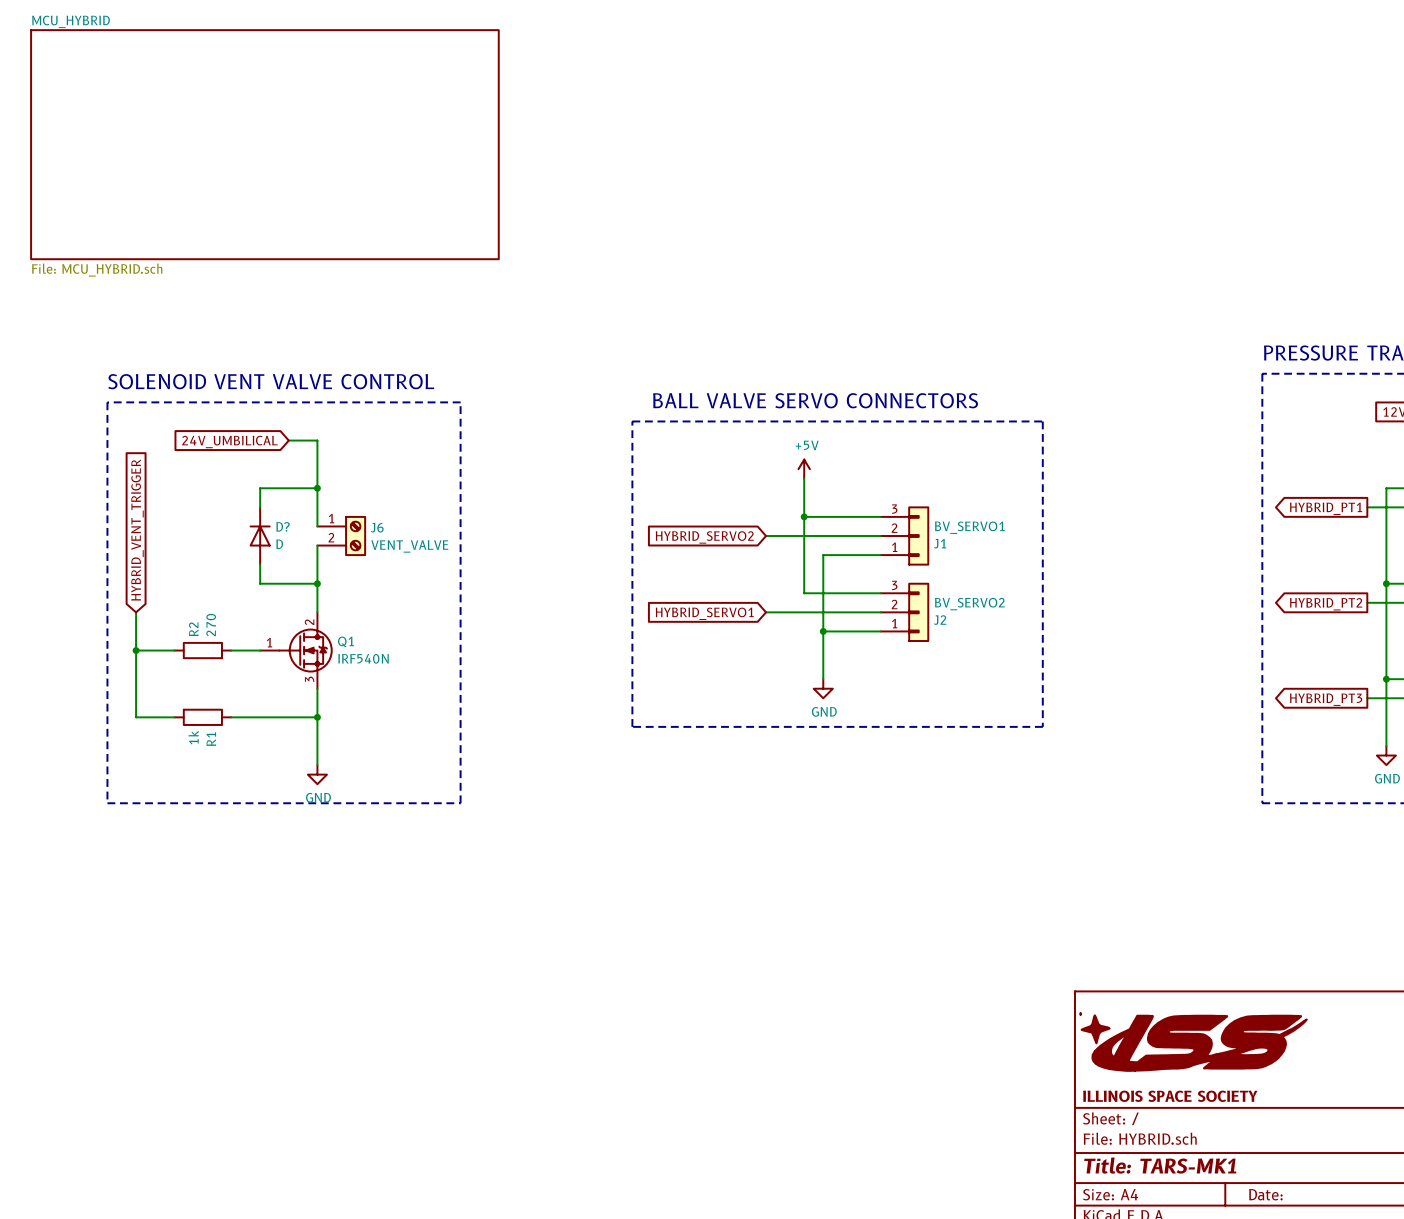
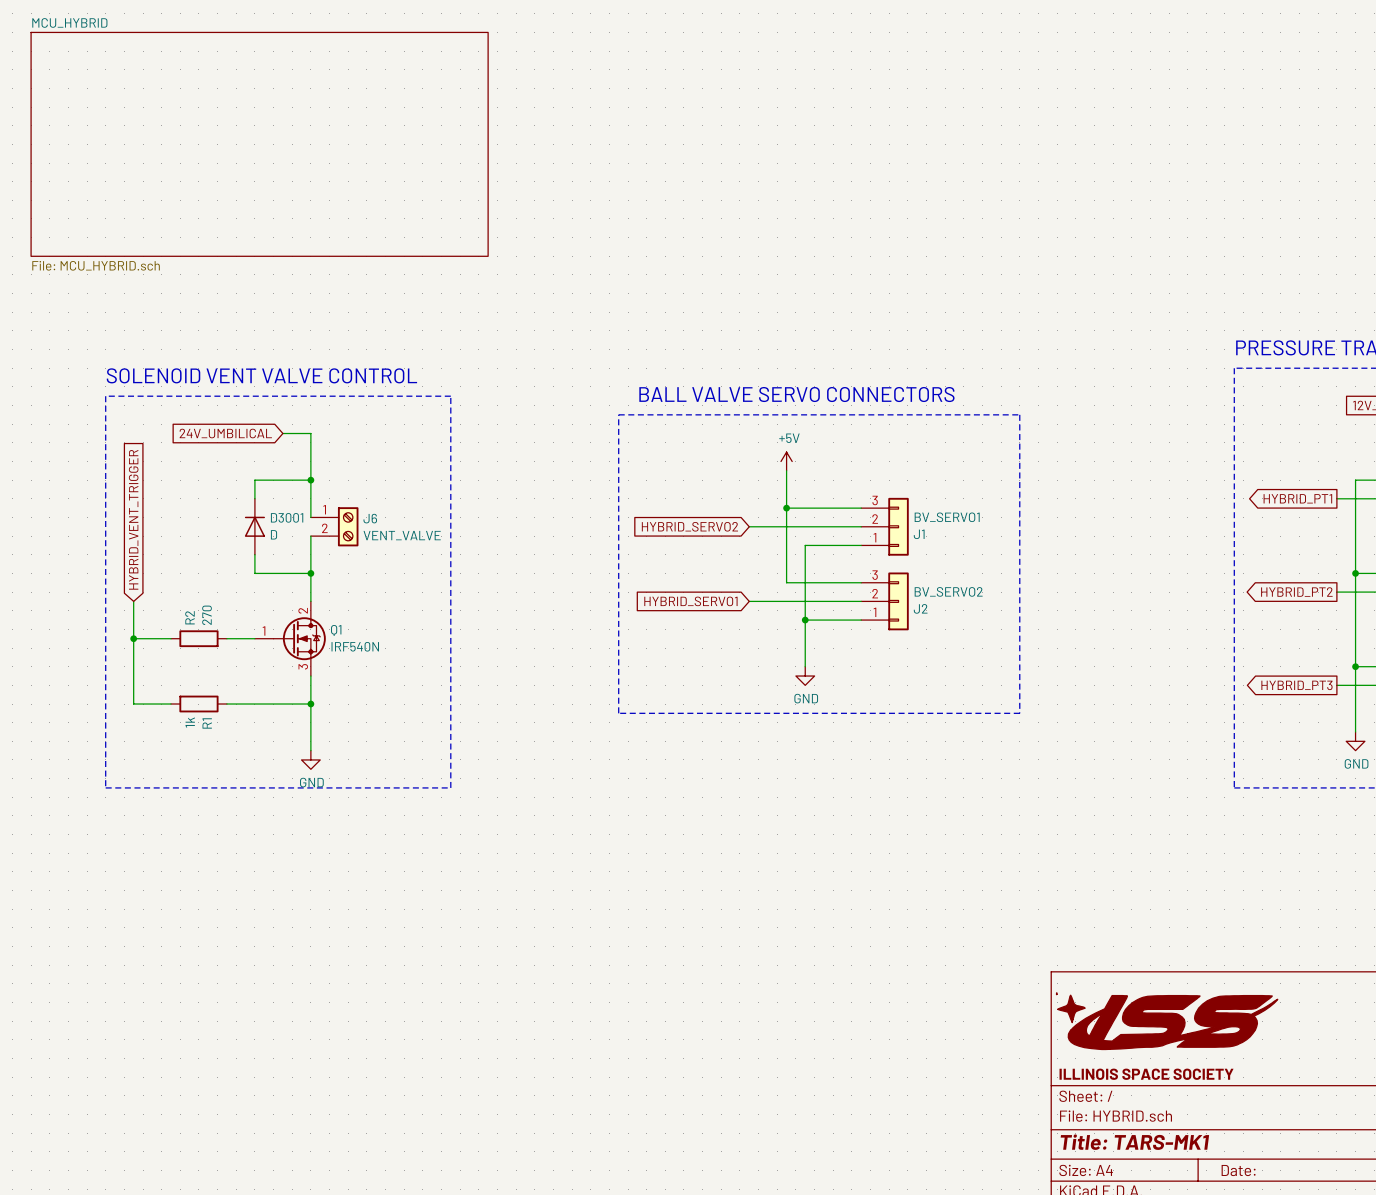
D? name: D? (282, 526) -> D3001 (287, 517)

